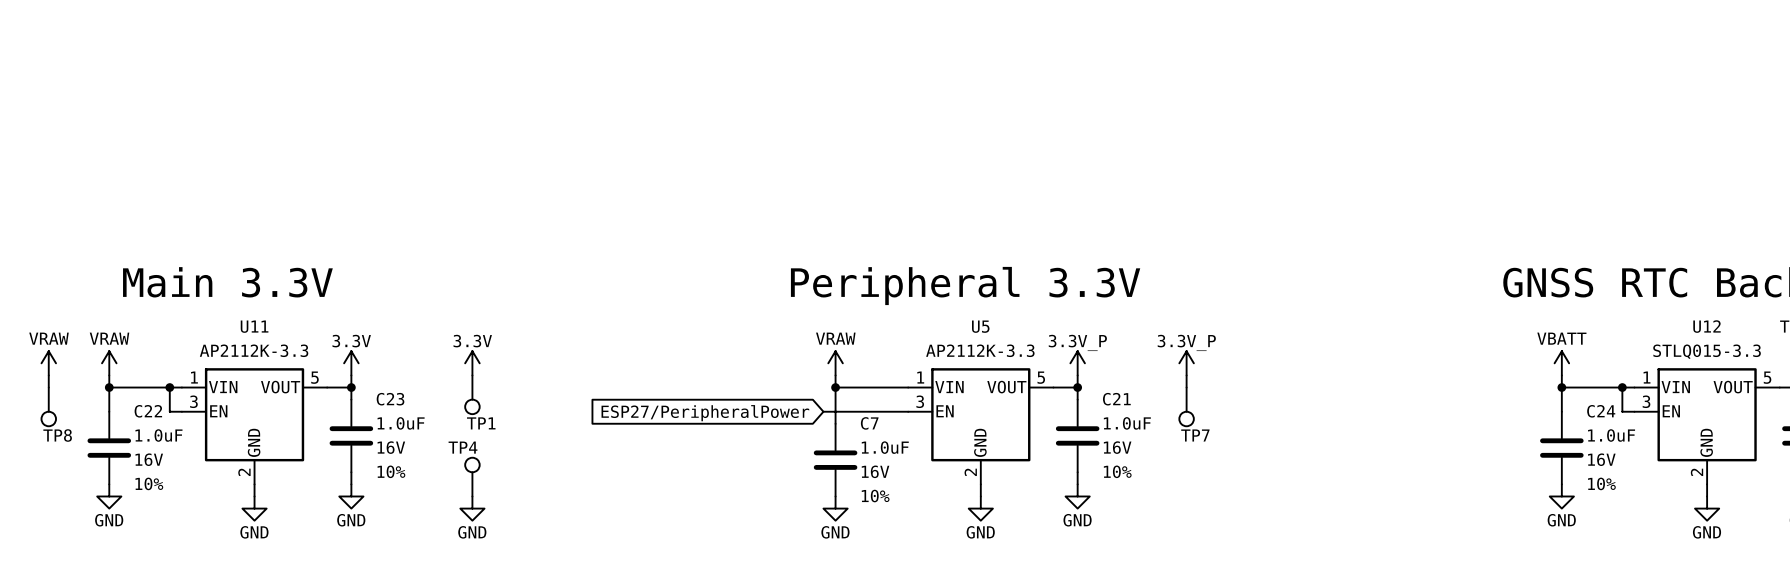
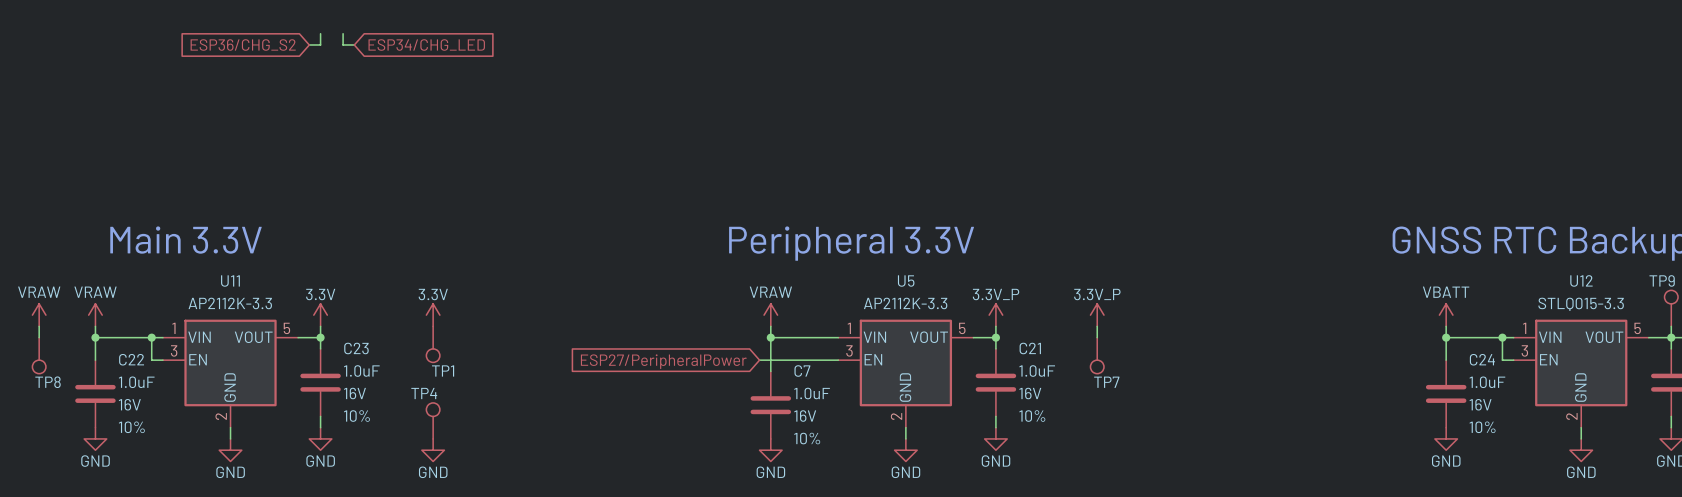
wire: none -> (320, 33) (320, 44) (309, 44)
wire: none -> (343, 33) (343, 44) (354, 44)
global label: none -> ESP36/CHG_S2 (243, 45)
global label: none -> ESP34/CHG_LED (426, 45)

